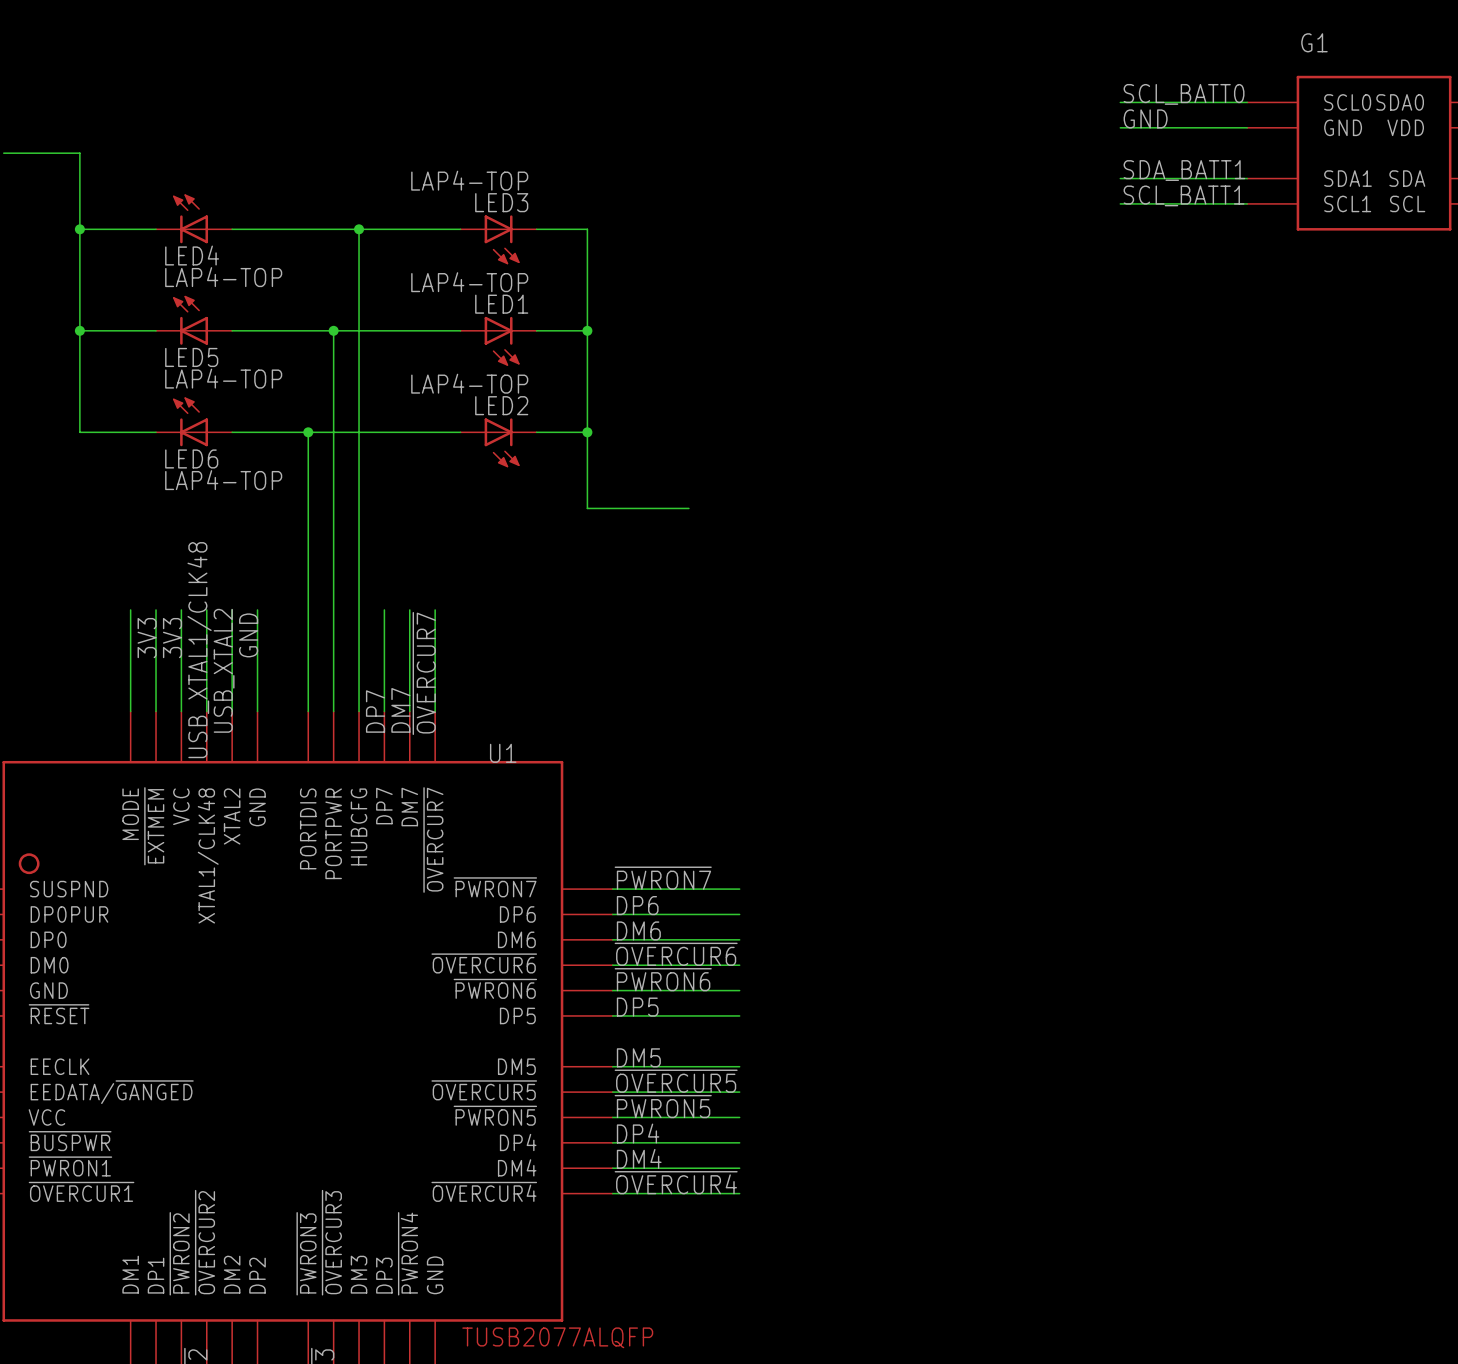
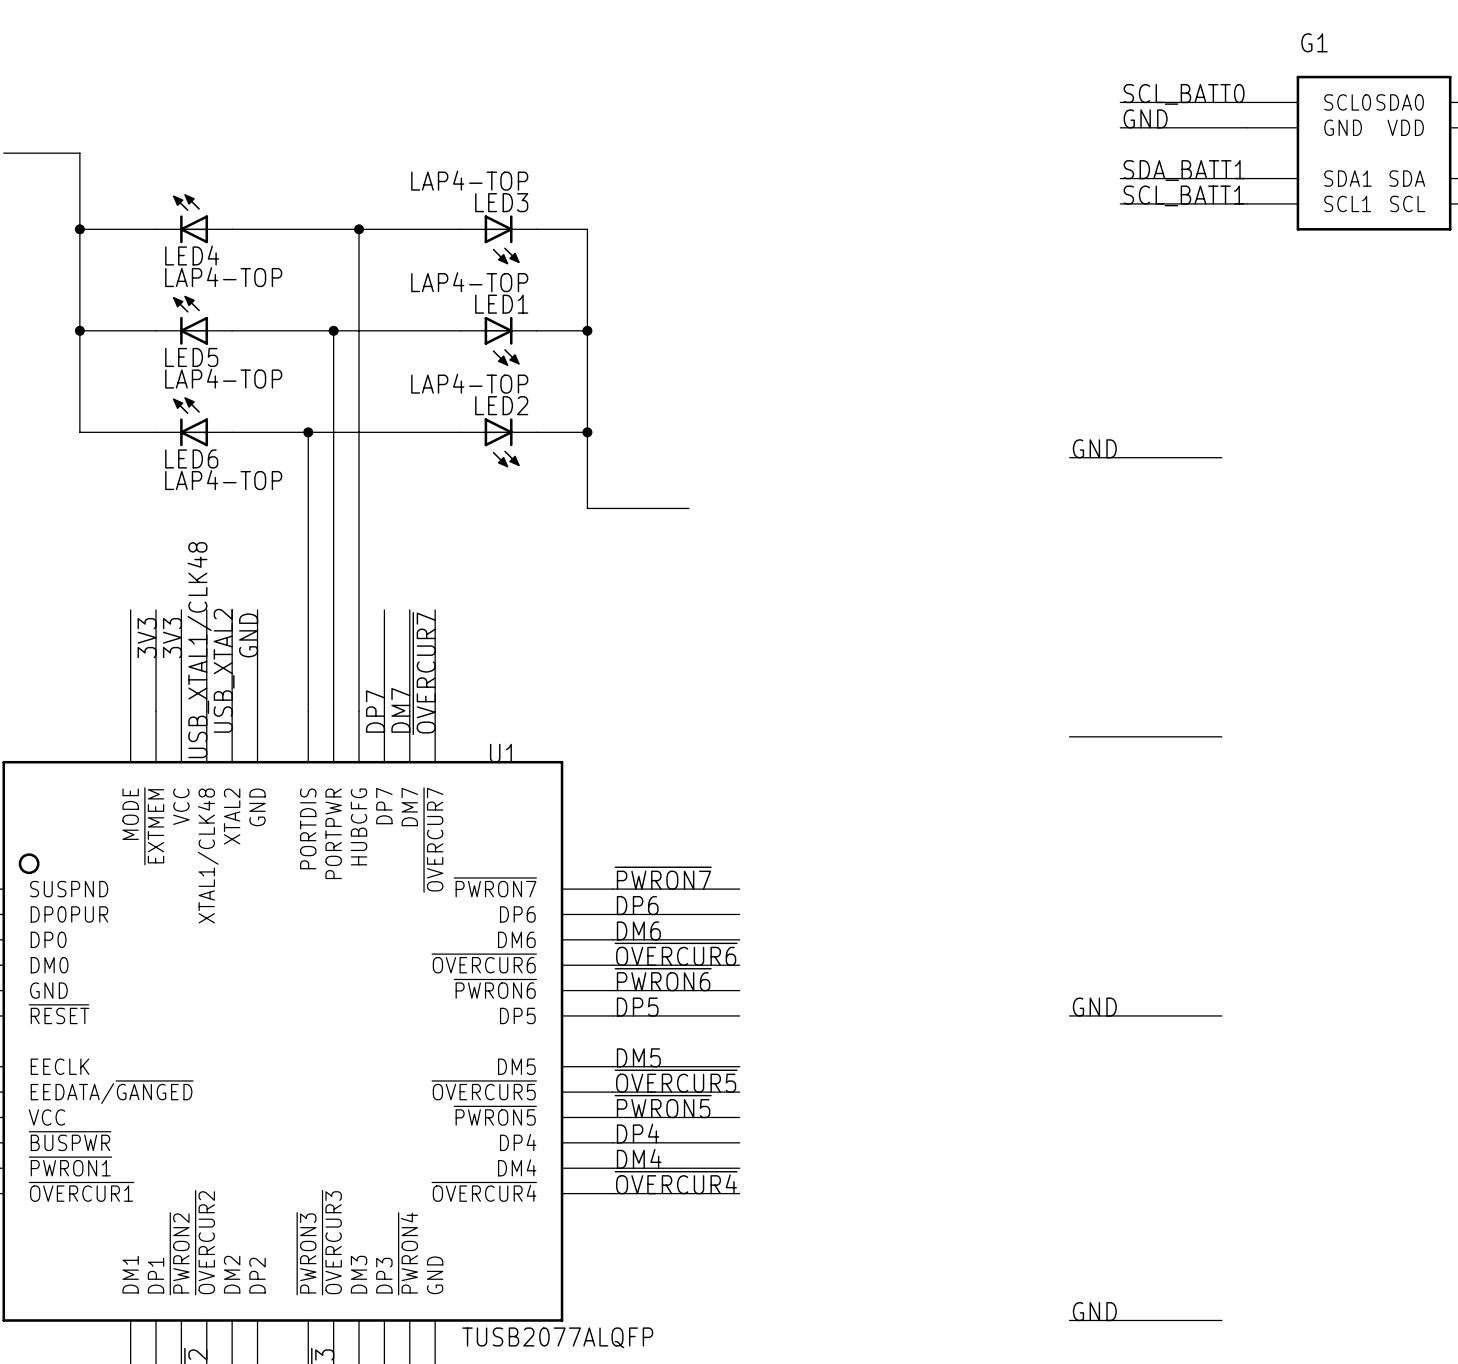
label: none -> GND (1094, 448)
wire: none -> (1069, 457) (1221, 457)
wire: none -> (1069, 736) (1221, 736)
label: none -> GND (1094, 1007)
wire: none -> (1069, 1015) (1221, 1015)
label: none -> GND (1094, 1311)
wire: none -> (1069, 1320) (1221, 1320)

